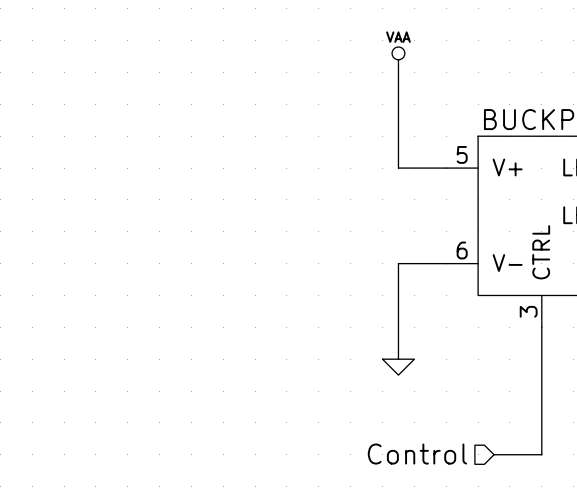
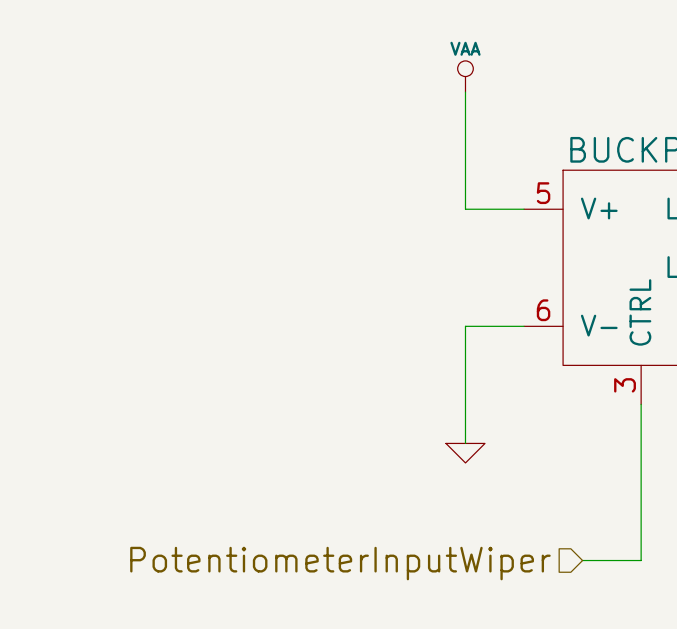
hierarchical label: Control (417, 454) -> PotentiometerInputWiper (340, 563)

